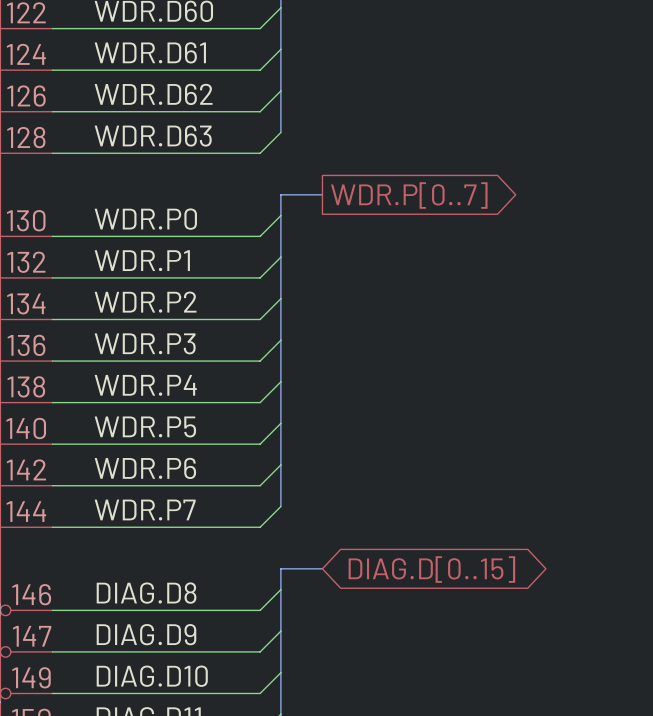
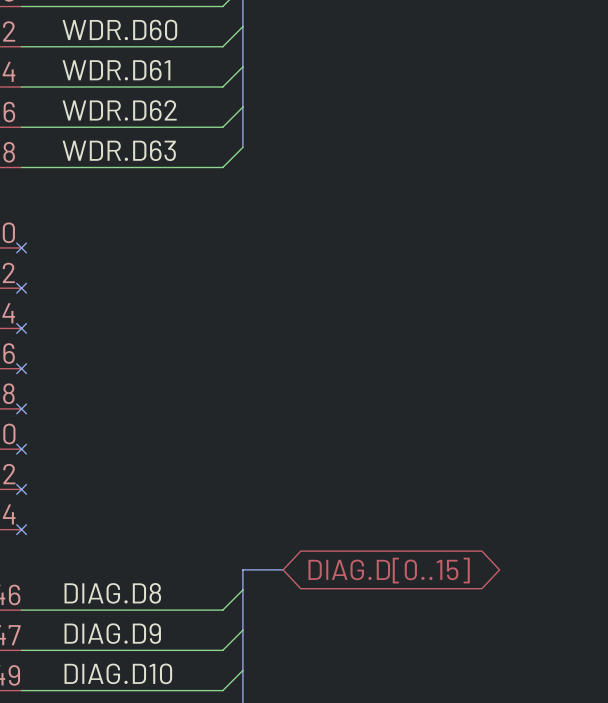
bus: (322, 194) (280, 194) (280, 506) -> none
global label: WDR.P[0..7] (409, 195) -> none
wire: (280, 215) (260, 236) (52, 236) -> none
label: WDR.P0 (145, 219) -> none
no-connect mark: none -> (21, 247)
wire: (280, 257) (260, 277) (52, 277) -> none
label: WDR.P1 (142, 260) -> none
no-connect mark: none -> (21, 288)
wire: (280, 298) (260, 319) (52, 319) -> none
label: WDR.P2 (145, 302) -> none
no-connect mark: none -> (21, 328)
wire: (280, 340) (260, 361) (52, 361) -> none
label: WDR.P3 (145, 343) -> none
no-connect mark: none -> (21, 368)
wire: (280, 381) (260, 402) (52, 402) -> none
label: WDR.P4 (145, 385) -> none
no-connect mark: none -> (21, 408)
wire: (280, 423) (260, 444) (52, 444) -> none
label: WDR.P5 (145, 426) -> none
no-connect mark: none -> (21, 449)
wire: (280, 464) (260, 485) (52, 485) -> none
label: WDR.P6 (145, 468) -> none
no-connect mark: none -> (21, 489)
wire: (280, 506) (260, 527) (52, 527) -> none
label: WDR.P7 (145, 509) -> none
no-connect mark: none -> (21, 529)

